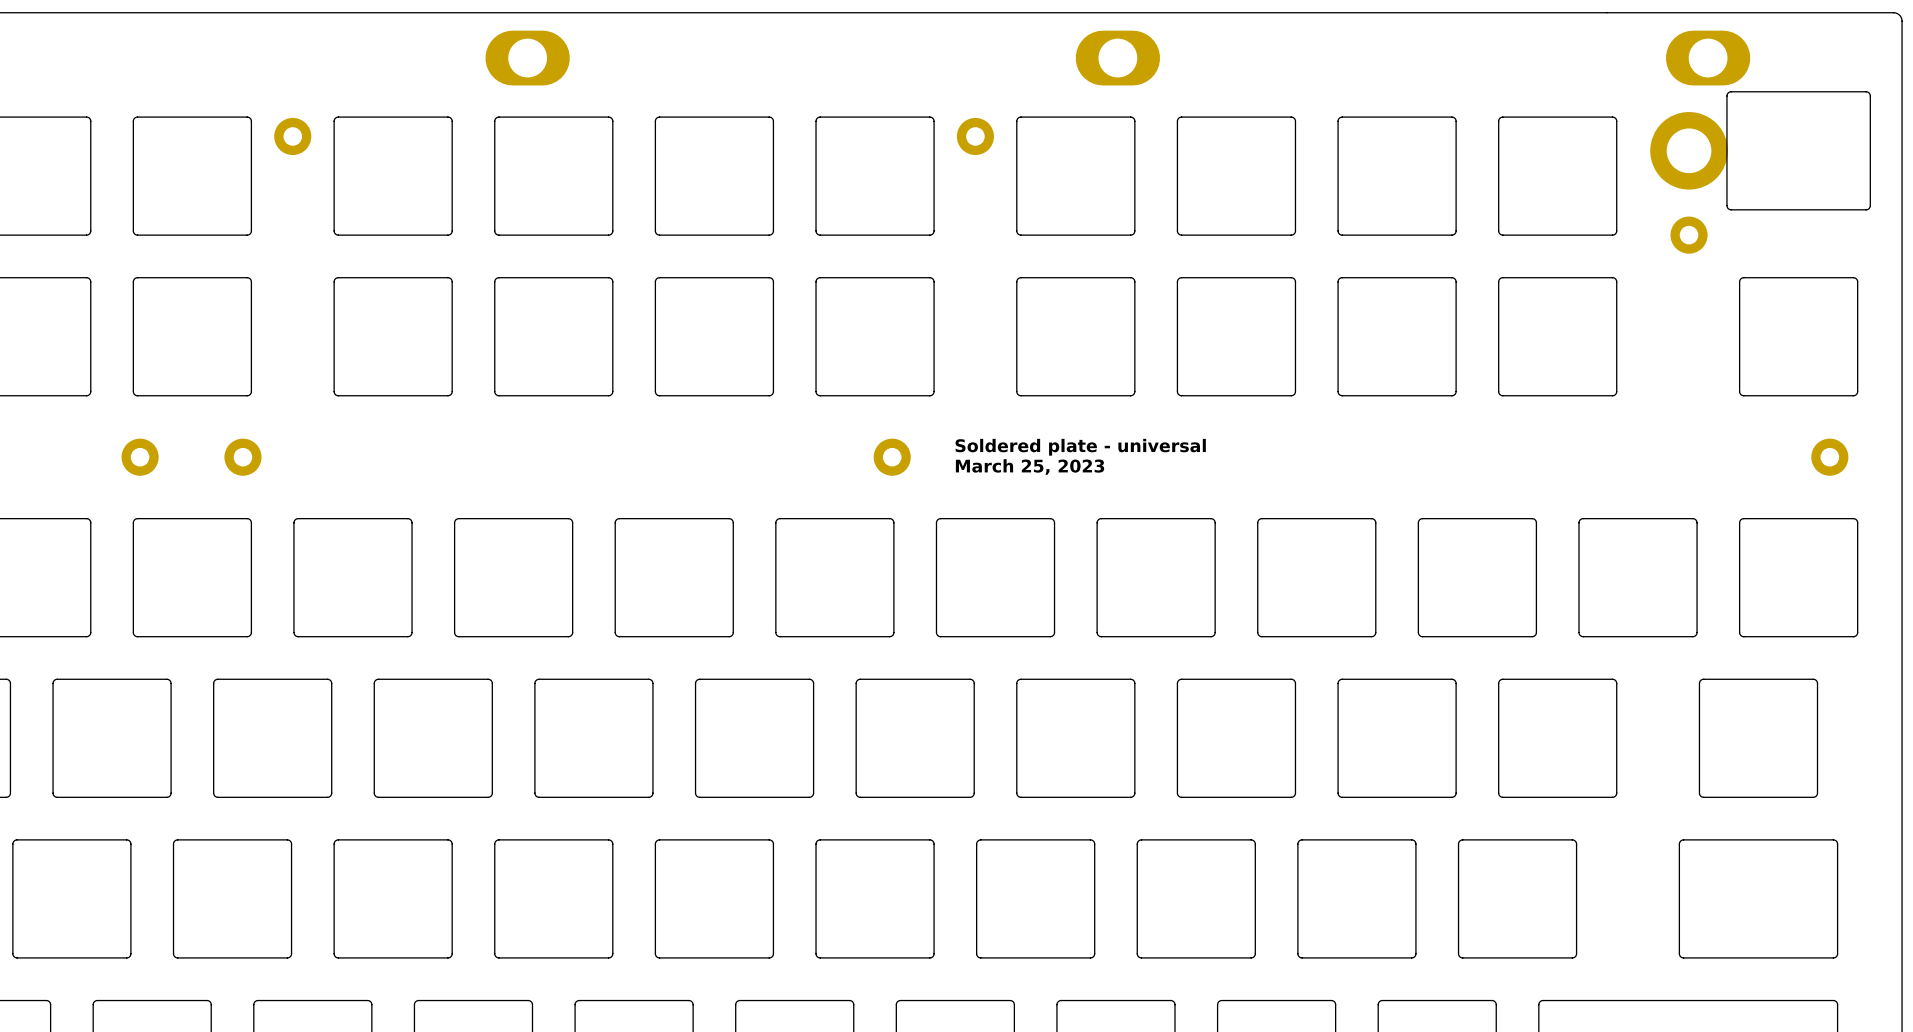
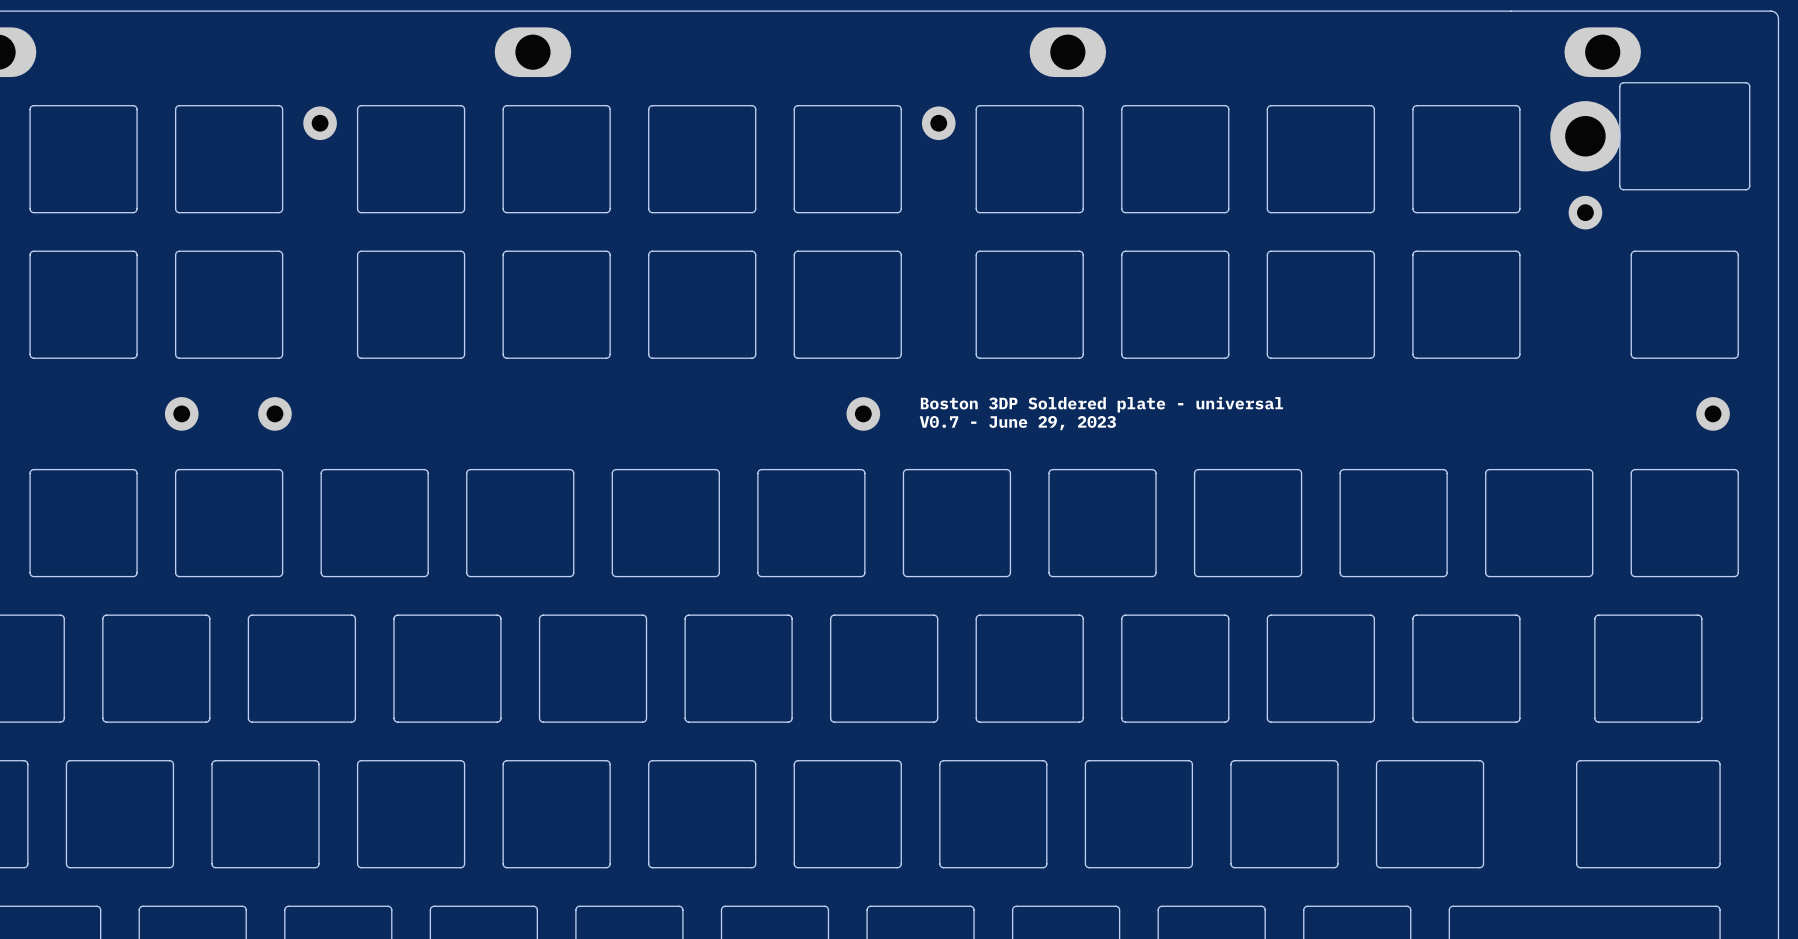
text: Soldered plate - universal (1080, 447) -> Boston 3DP Soldered plate - universal (1101, 404)
text: March 25, 2023 (1030, 467) -> V0.7 - June 29, 2023 (1017, 423)

